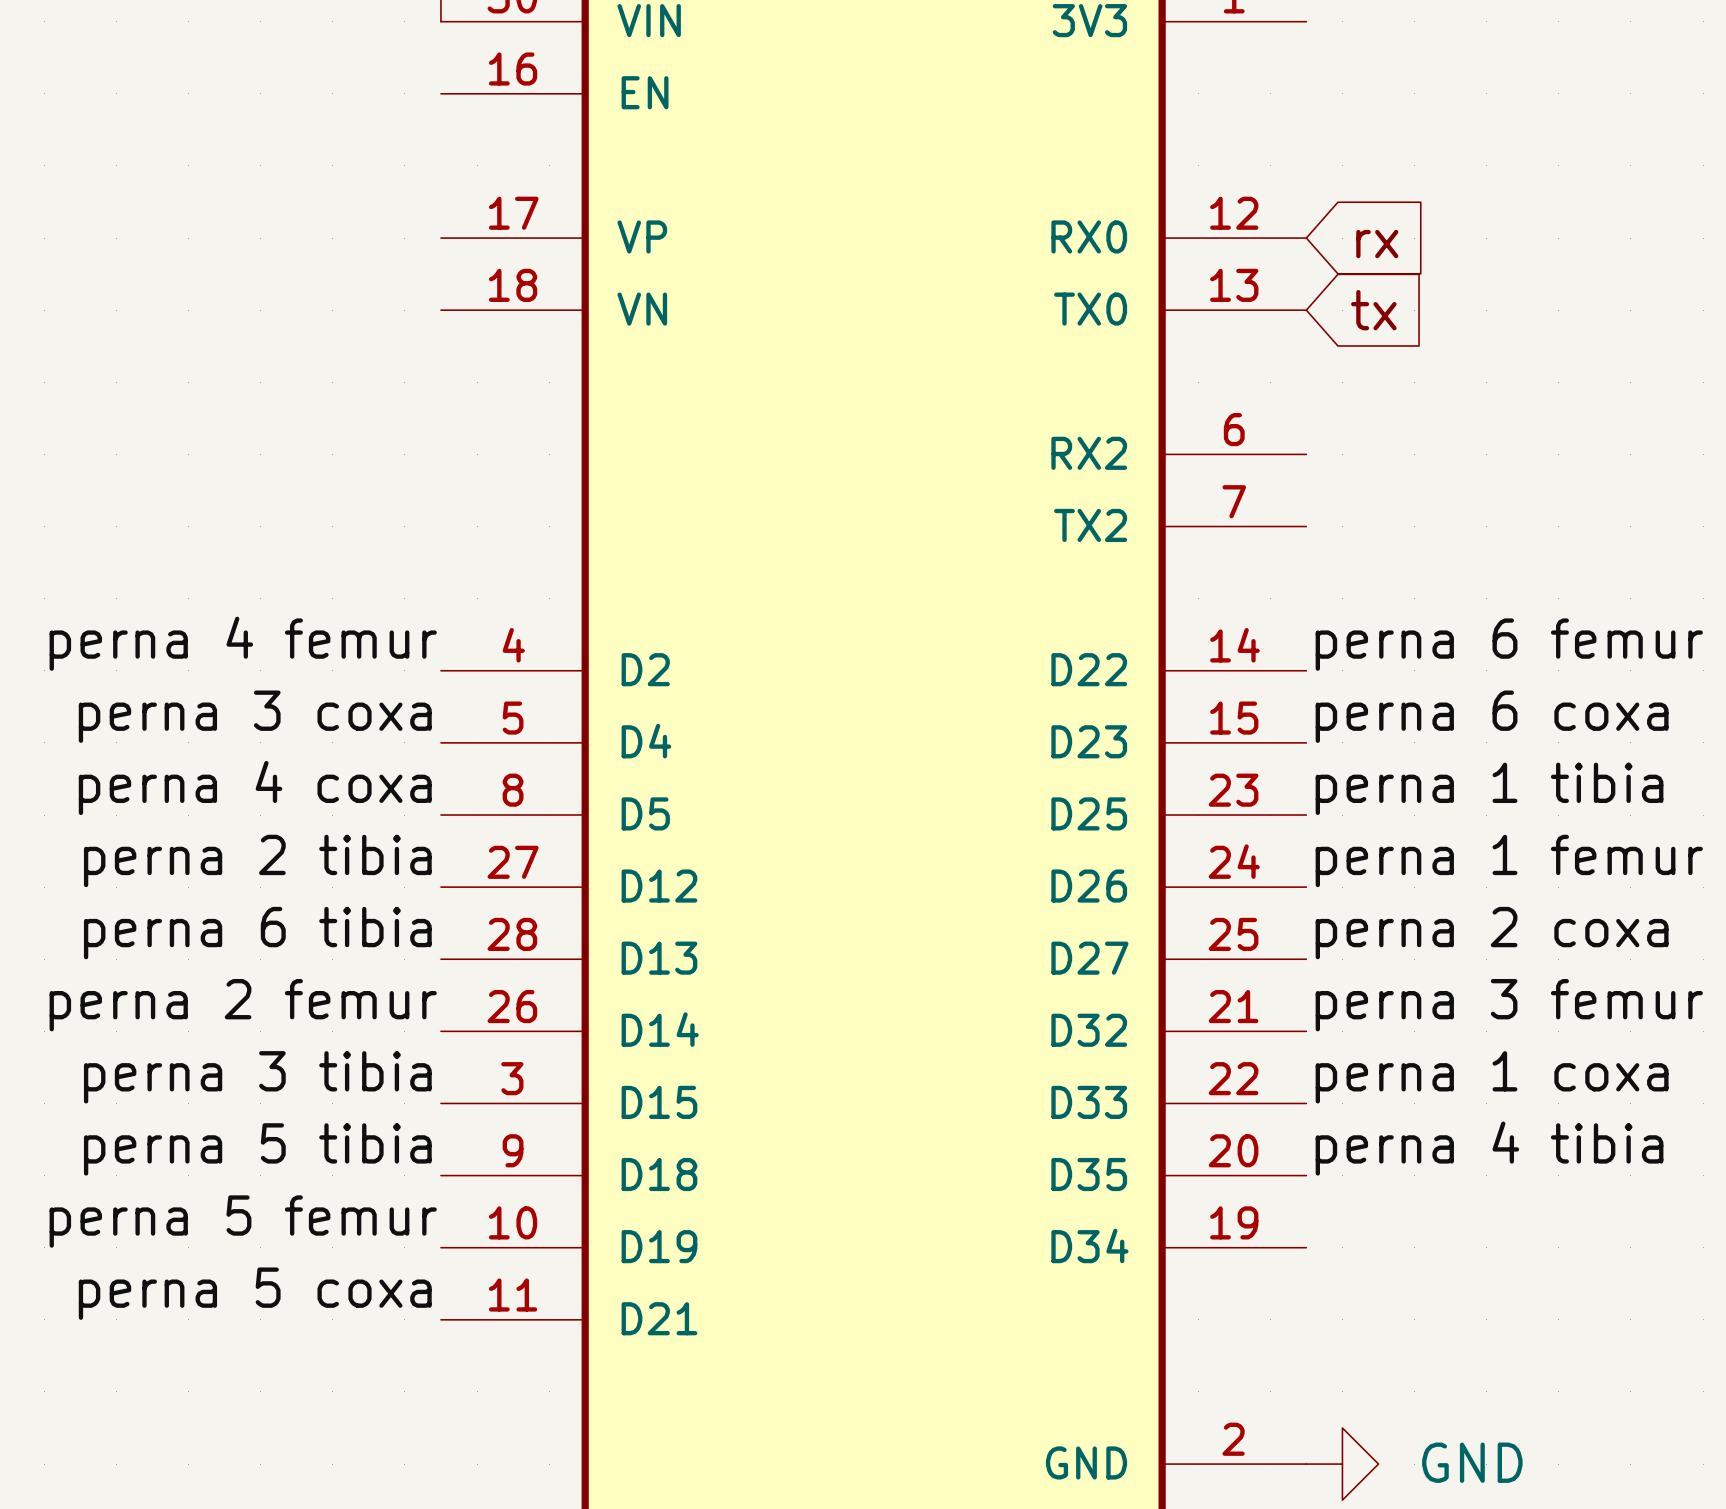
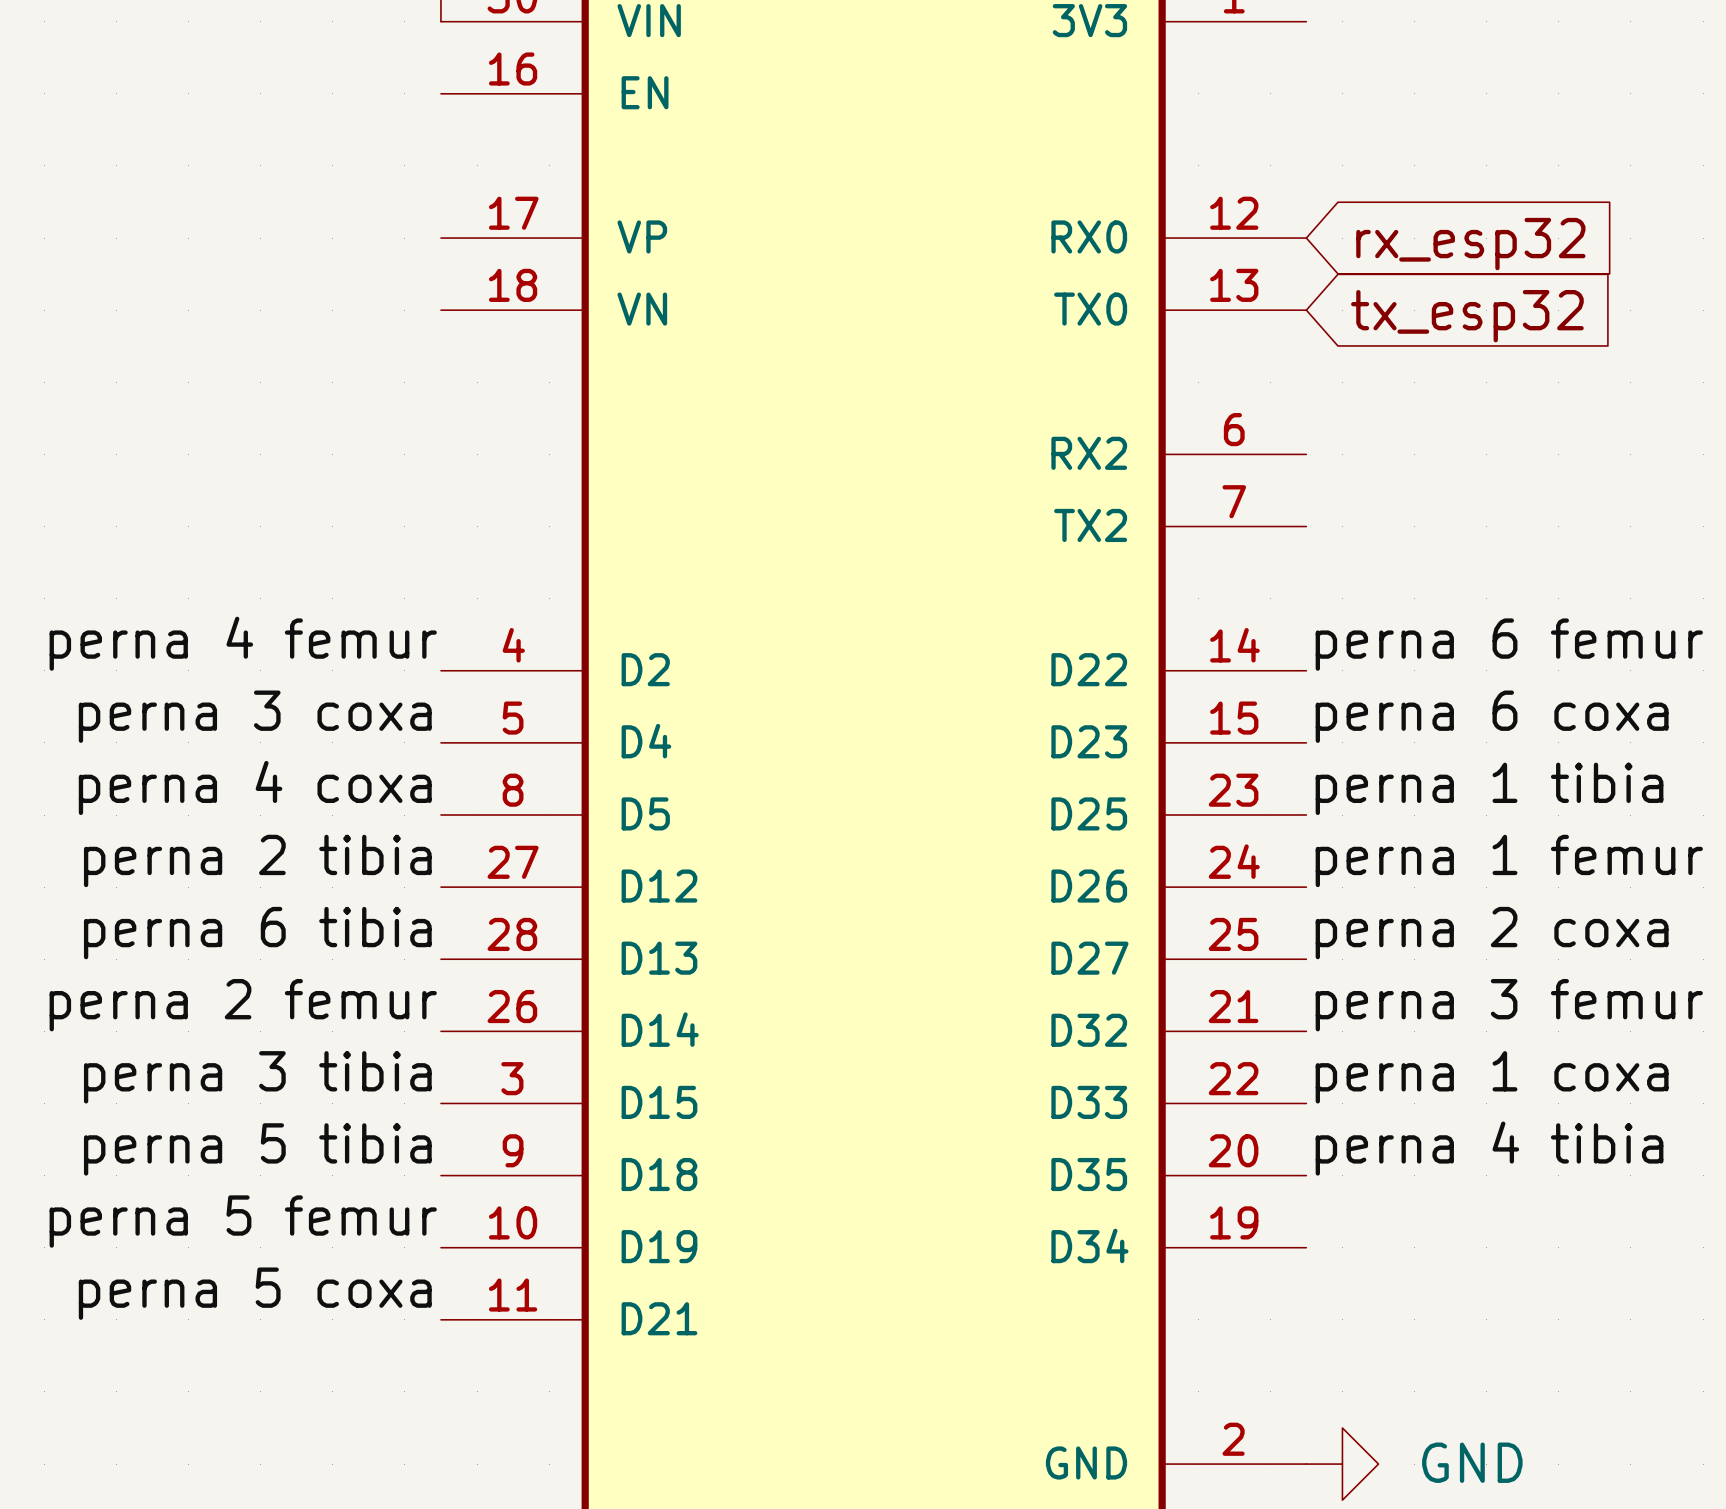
global label: rx (1377, 244) -> rx_esp32 (1470, 244)
global label: tx (1373, 310) -> tx_esp32 (1467, 316)

